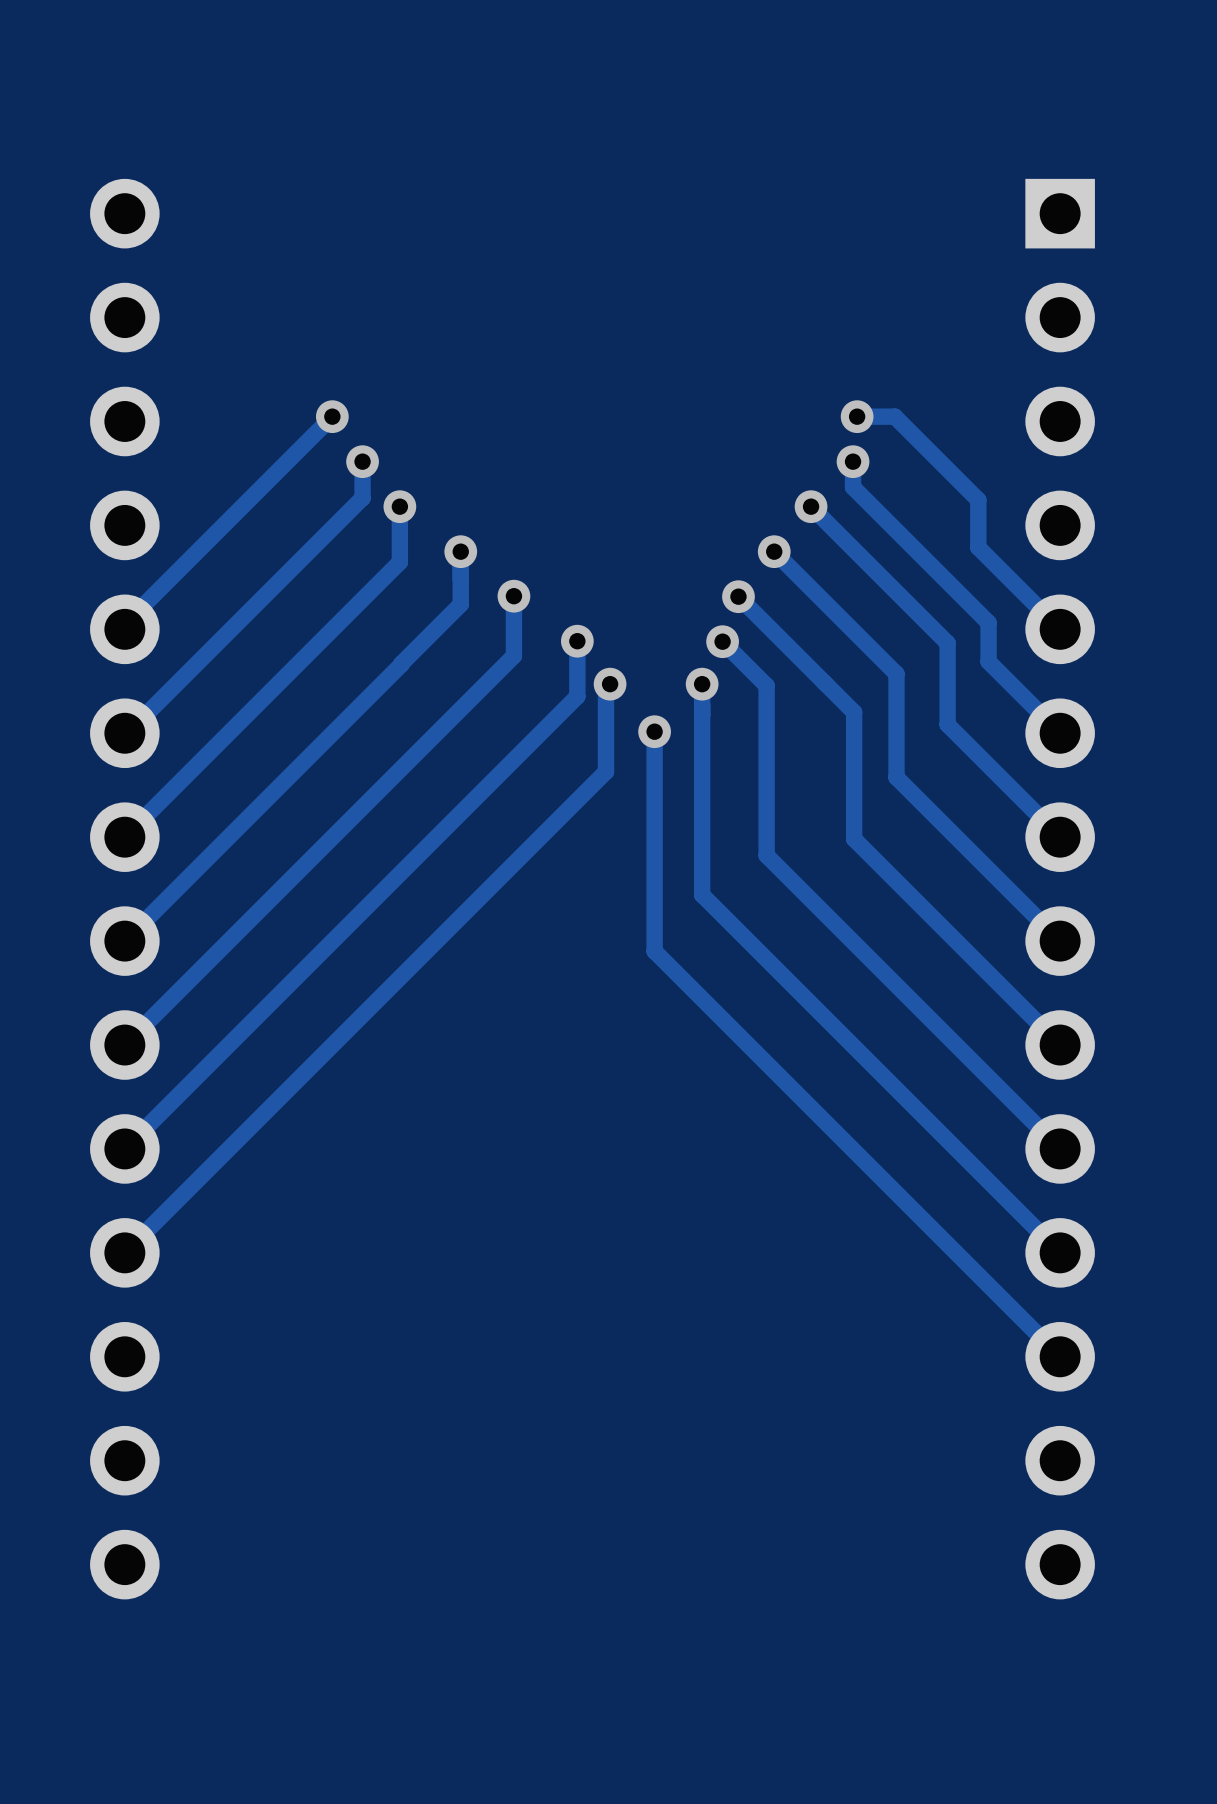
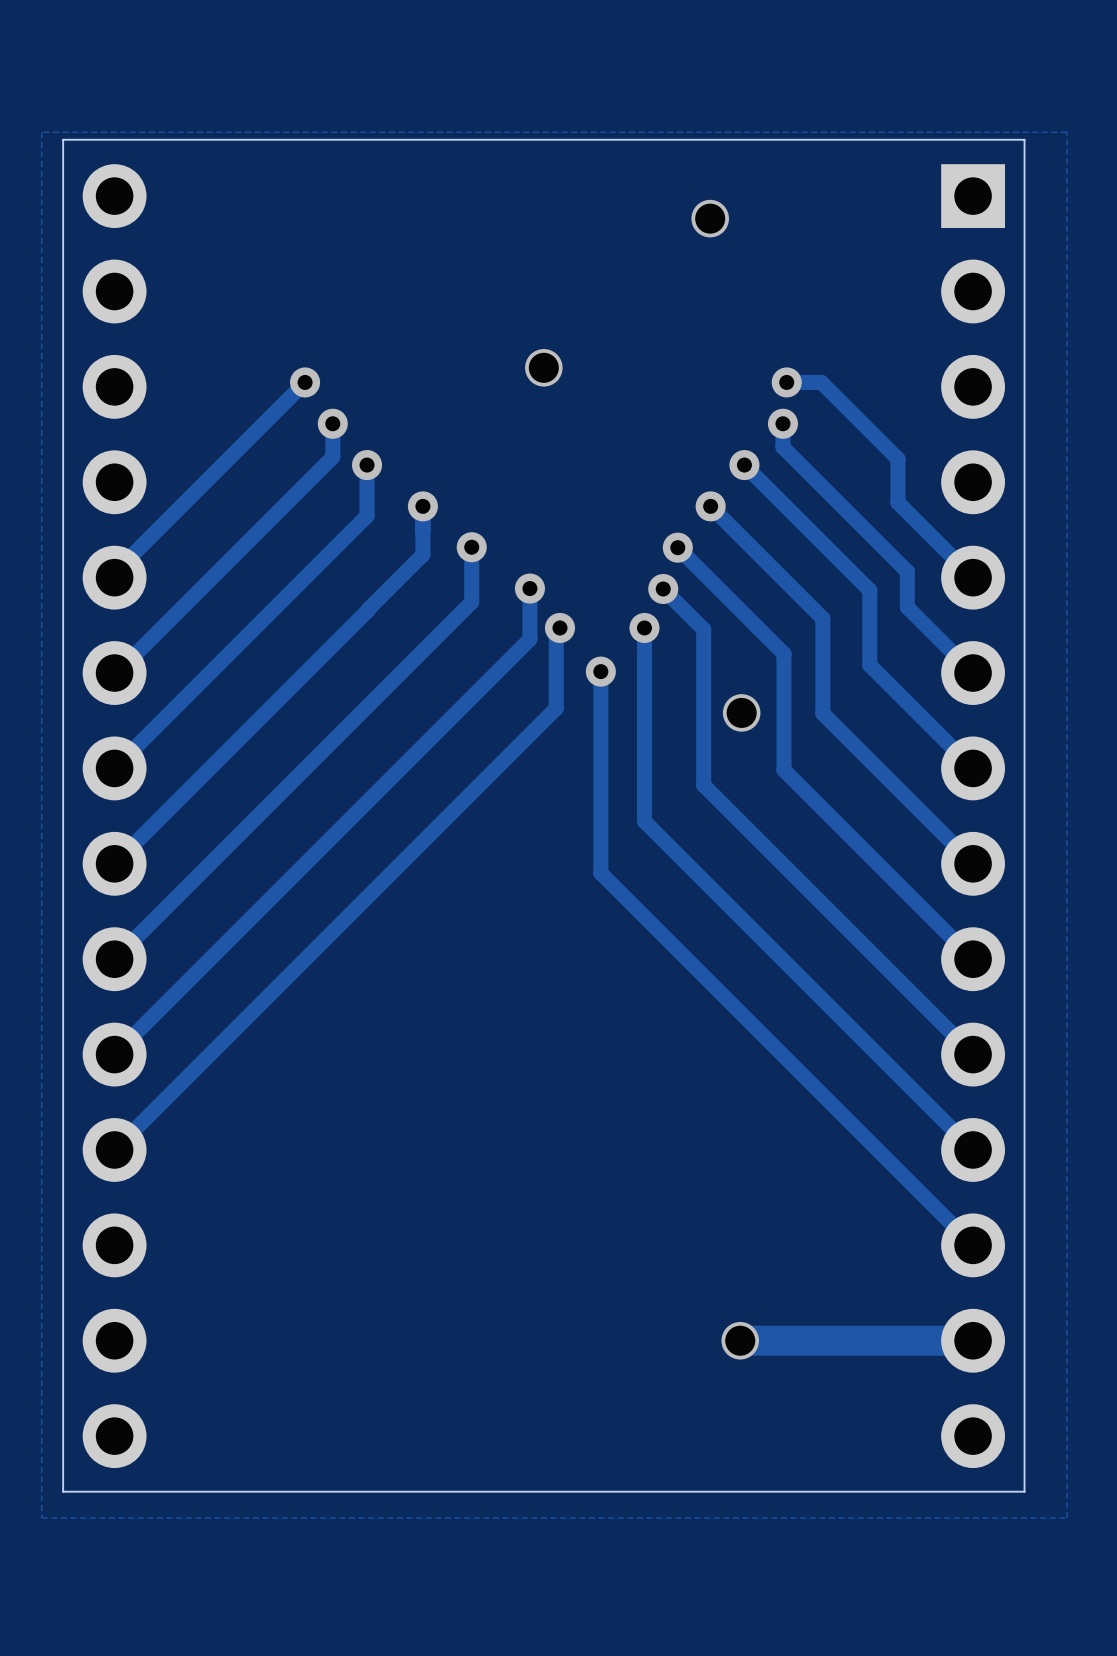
zone outline: none -> (1066, 132) (1066, 1518) (41, 1518) (41, 132) (1066, 132)
board edge: none -> (1024, 139) (63, 139) (63, 1491) (1024, 1491) (1024, 139)
via: none -> (710, 218)
via: none -> (543, 367)
via: none -> (741, 712)
via: none -> (740, 1340)
track: none -> (973, 1340) (740, 1340)

